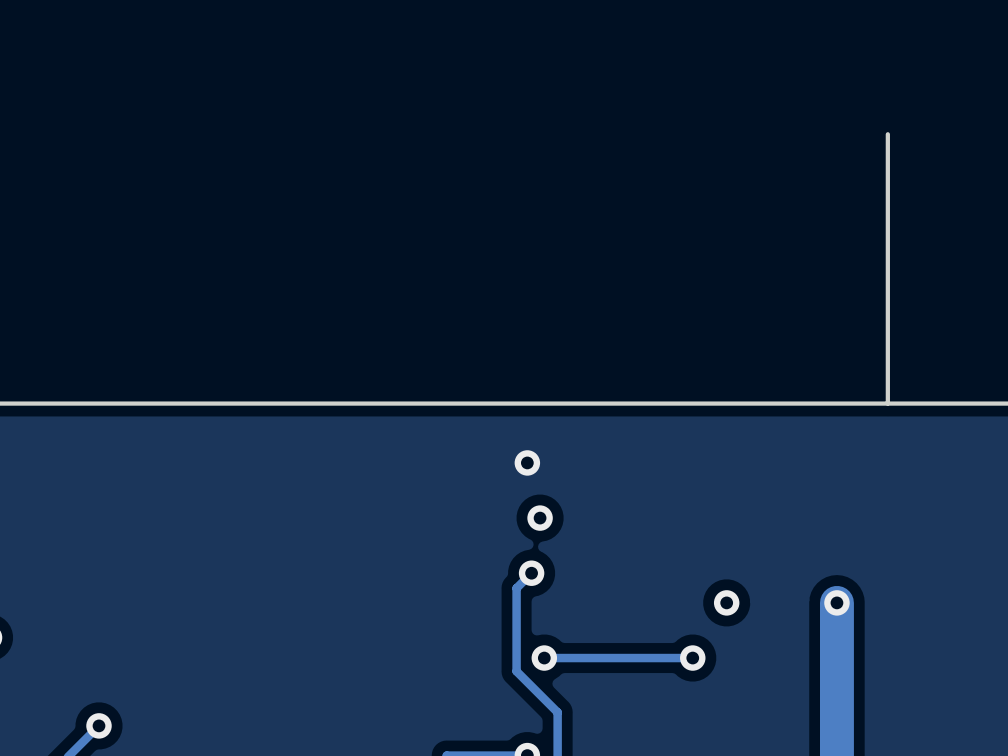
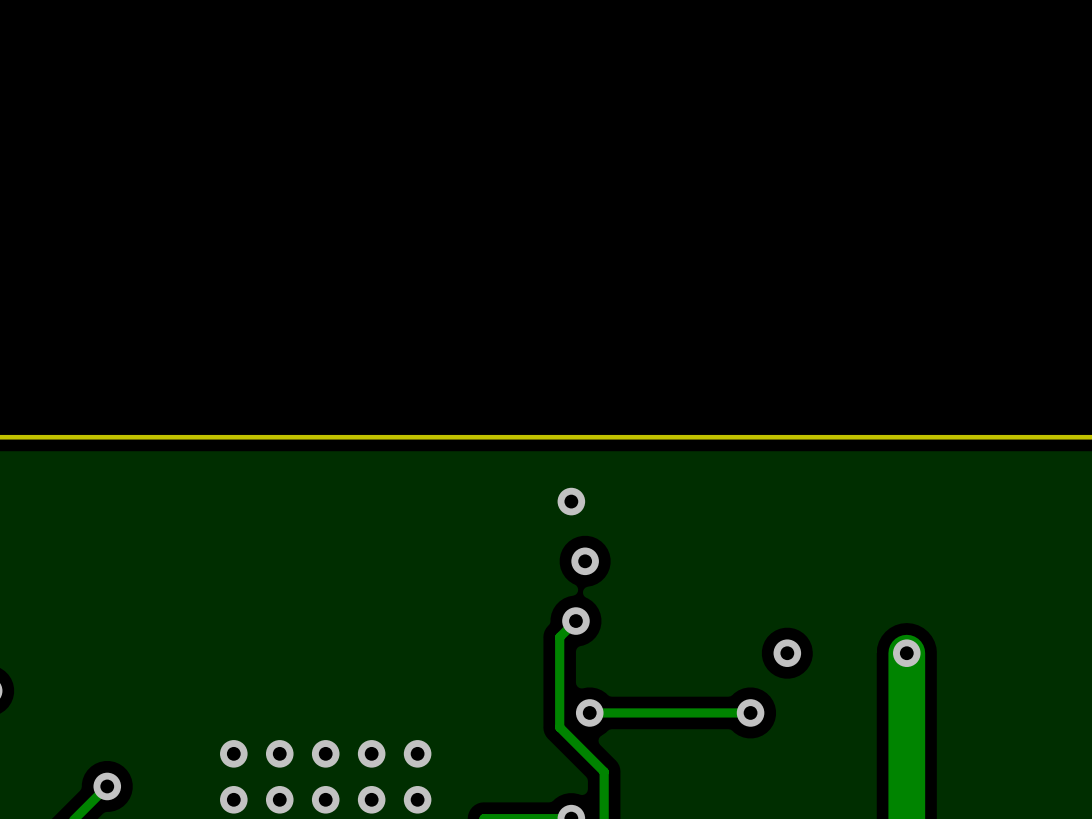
board edge: (887, 134) (887, 403) -> none
via: none -> (233, 753)
via: none -> (279, 753)
via: none -> (325, 753)
via: none -> (371, 753)
via: none -> (417, 753)
via: none -> (233, 799)
via: none -> (279, 799)
via: none -> (325, 799)
via: none -> (371, 799)
via: none -> (417, 799)

